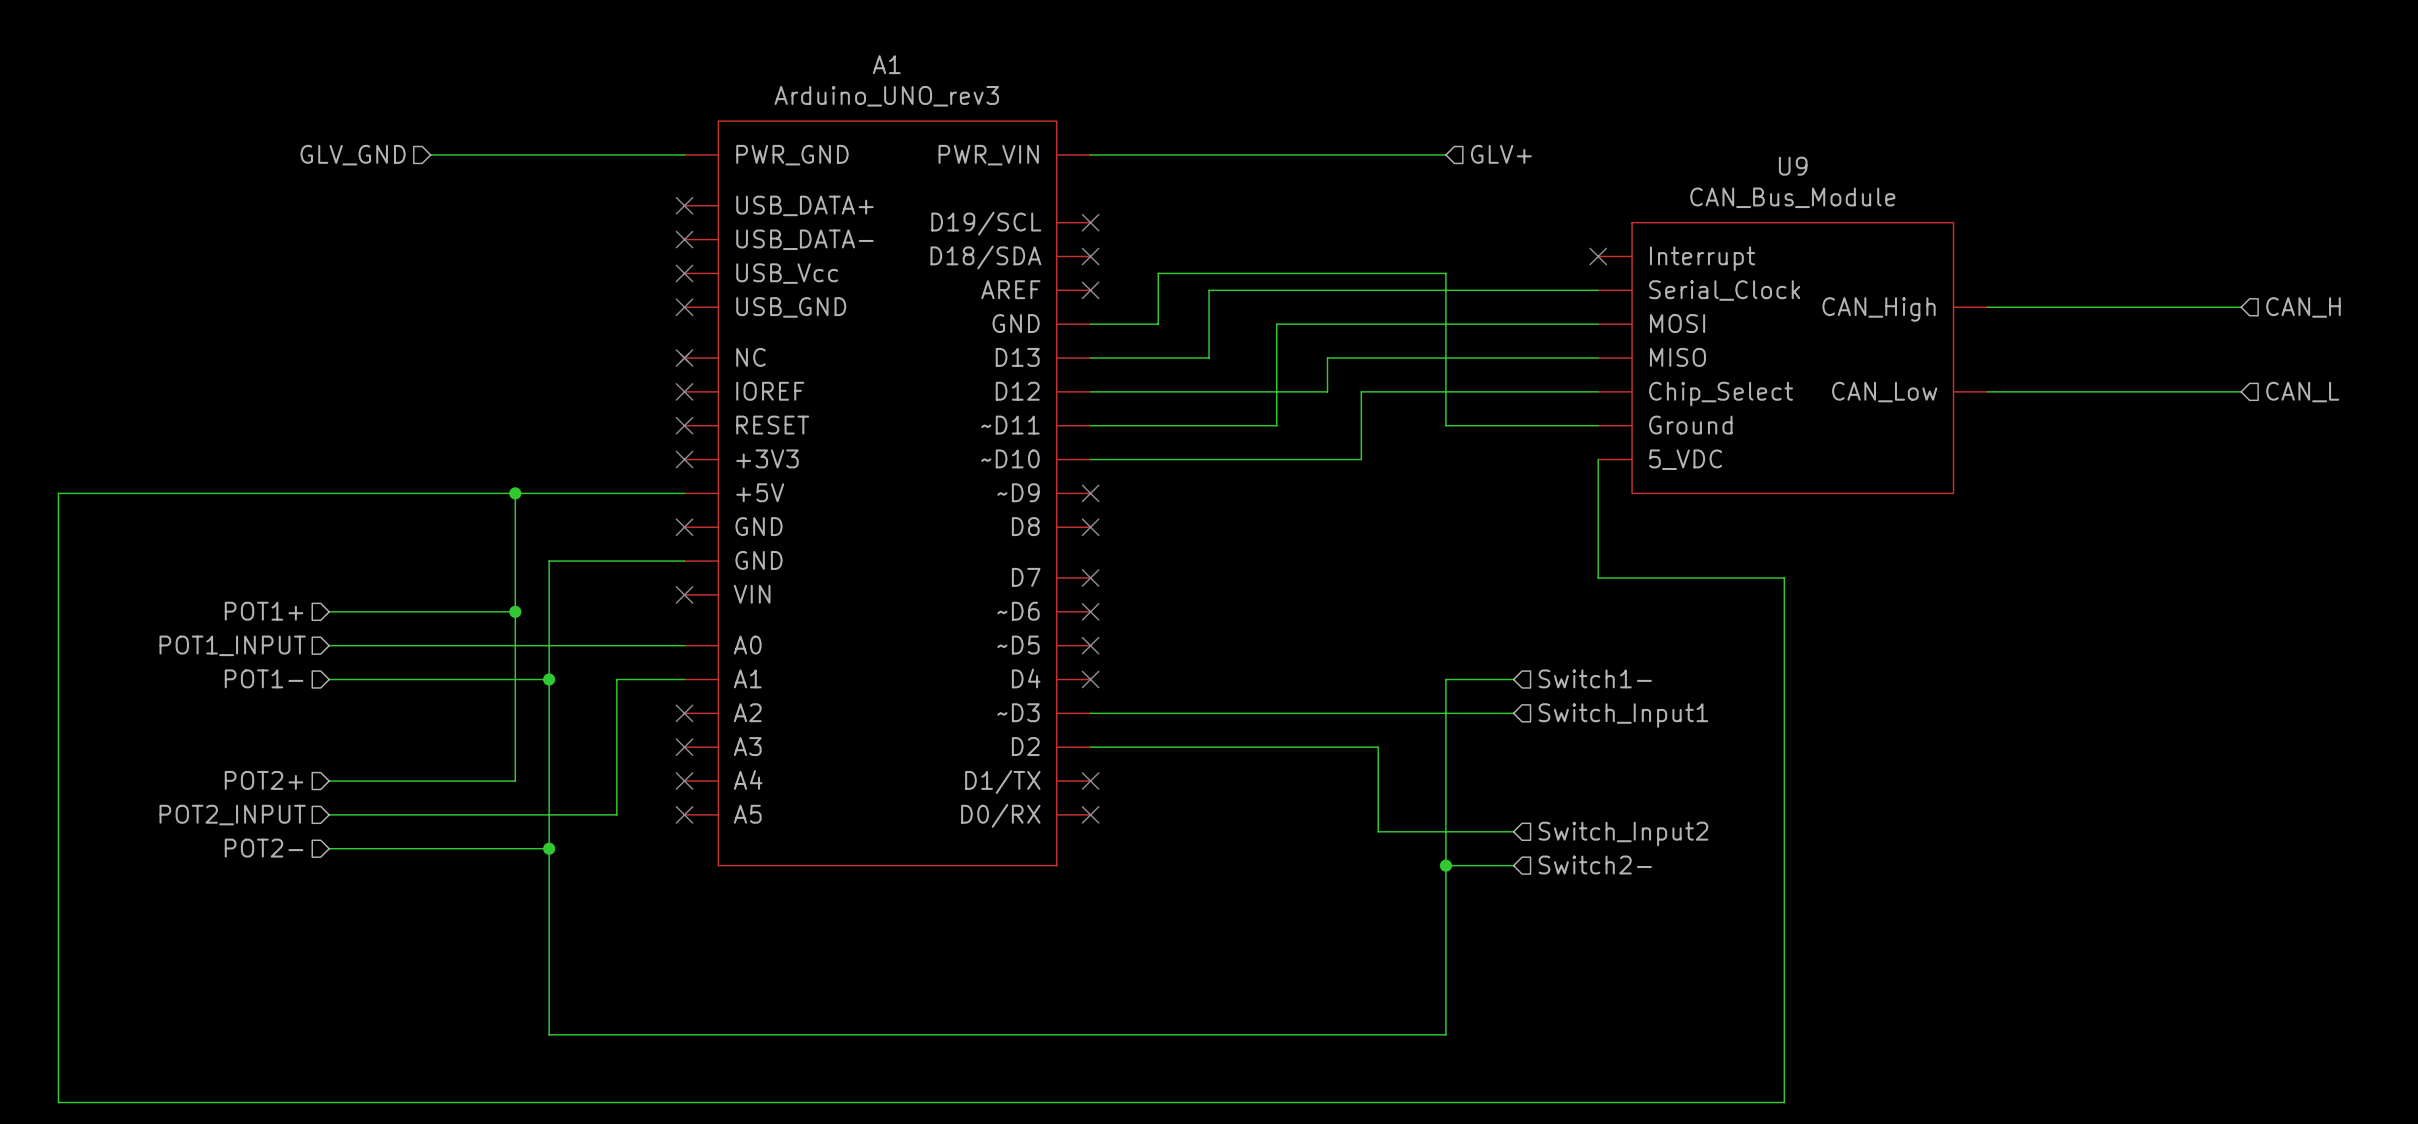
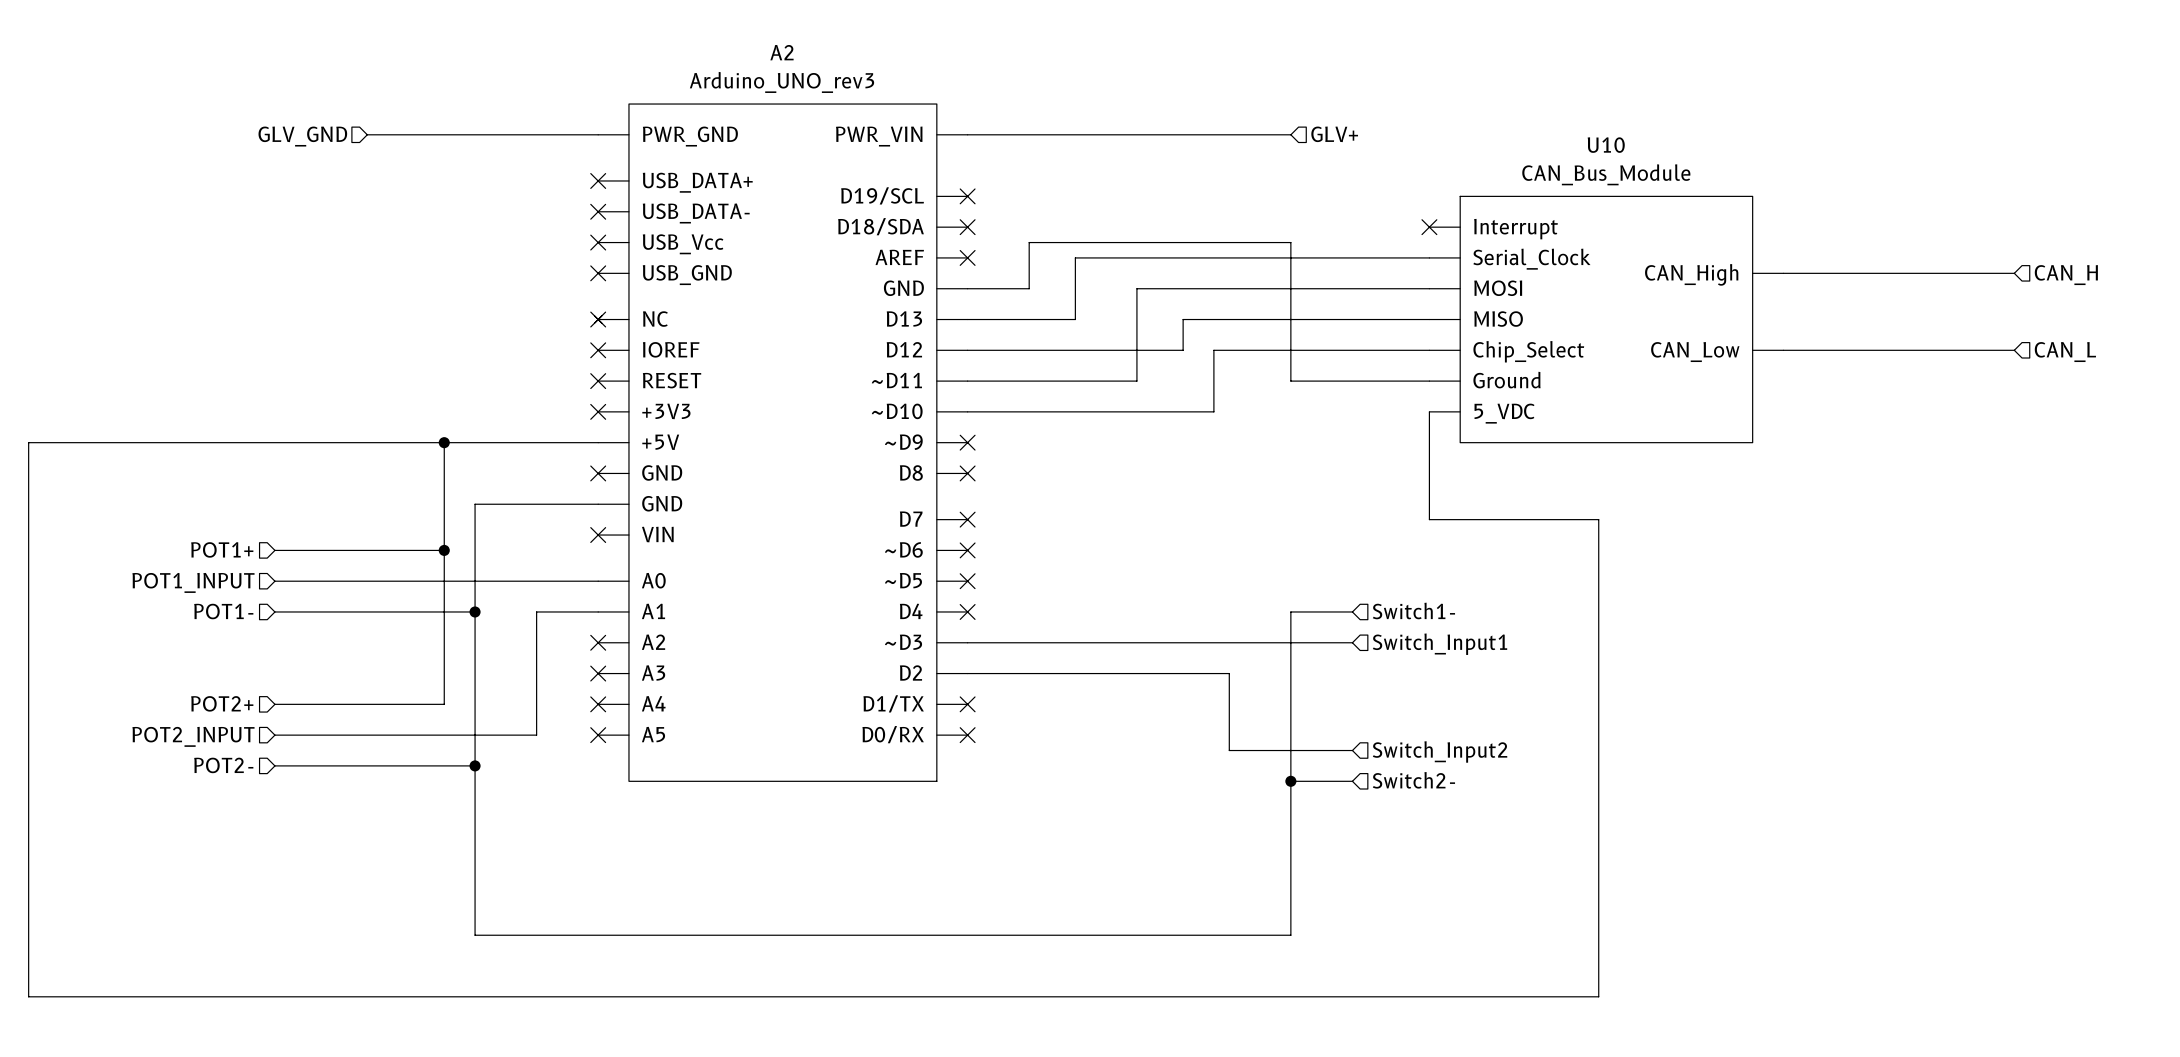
A1 name: A1 (886, 64) -> A2 (781, 52)
U9 name: U9 (1793, 166) -> U10 (1606, 145)

